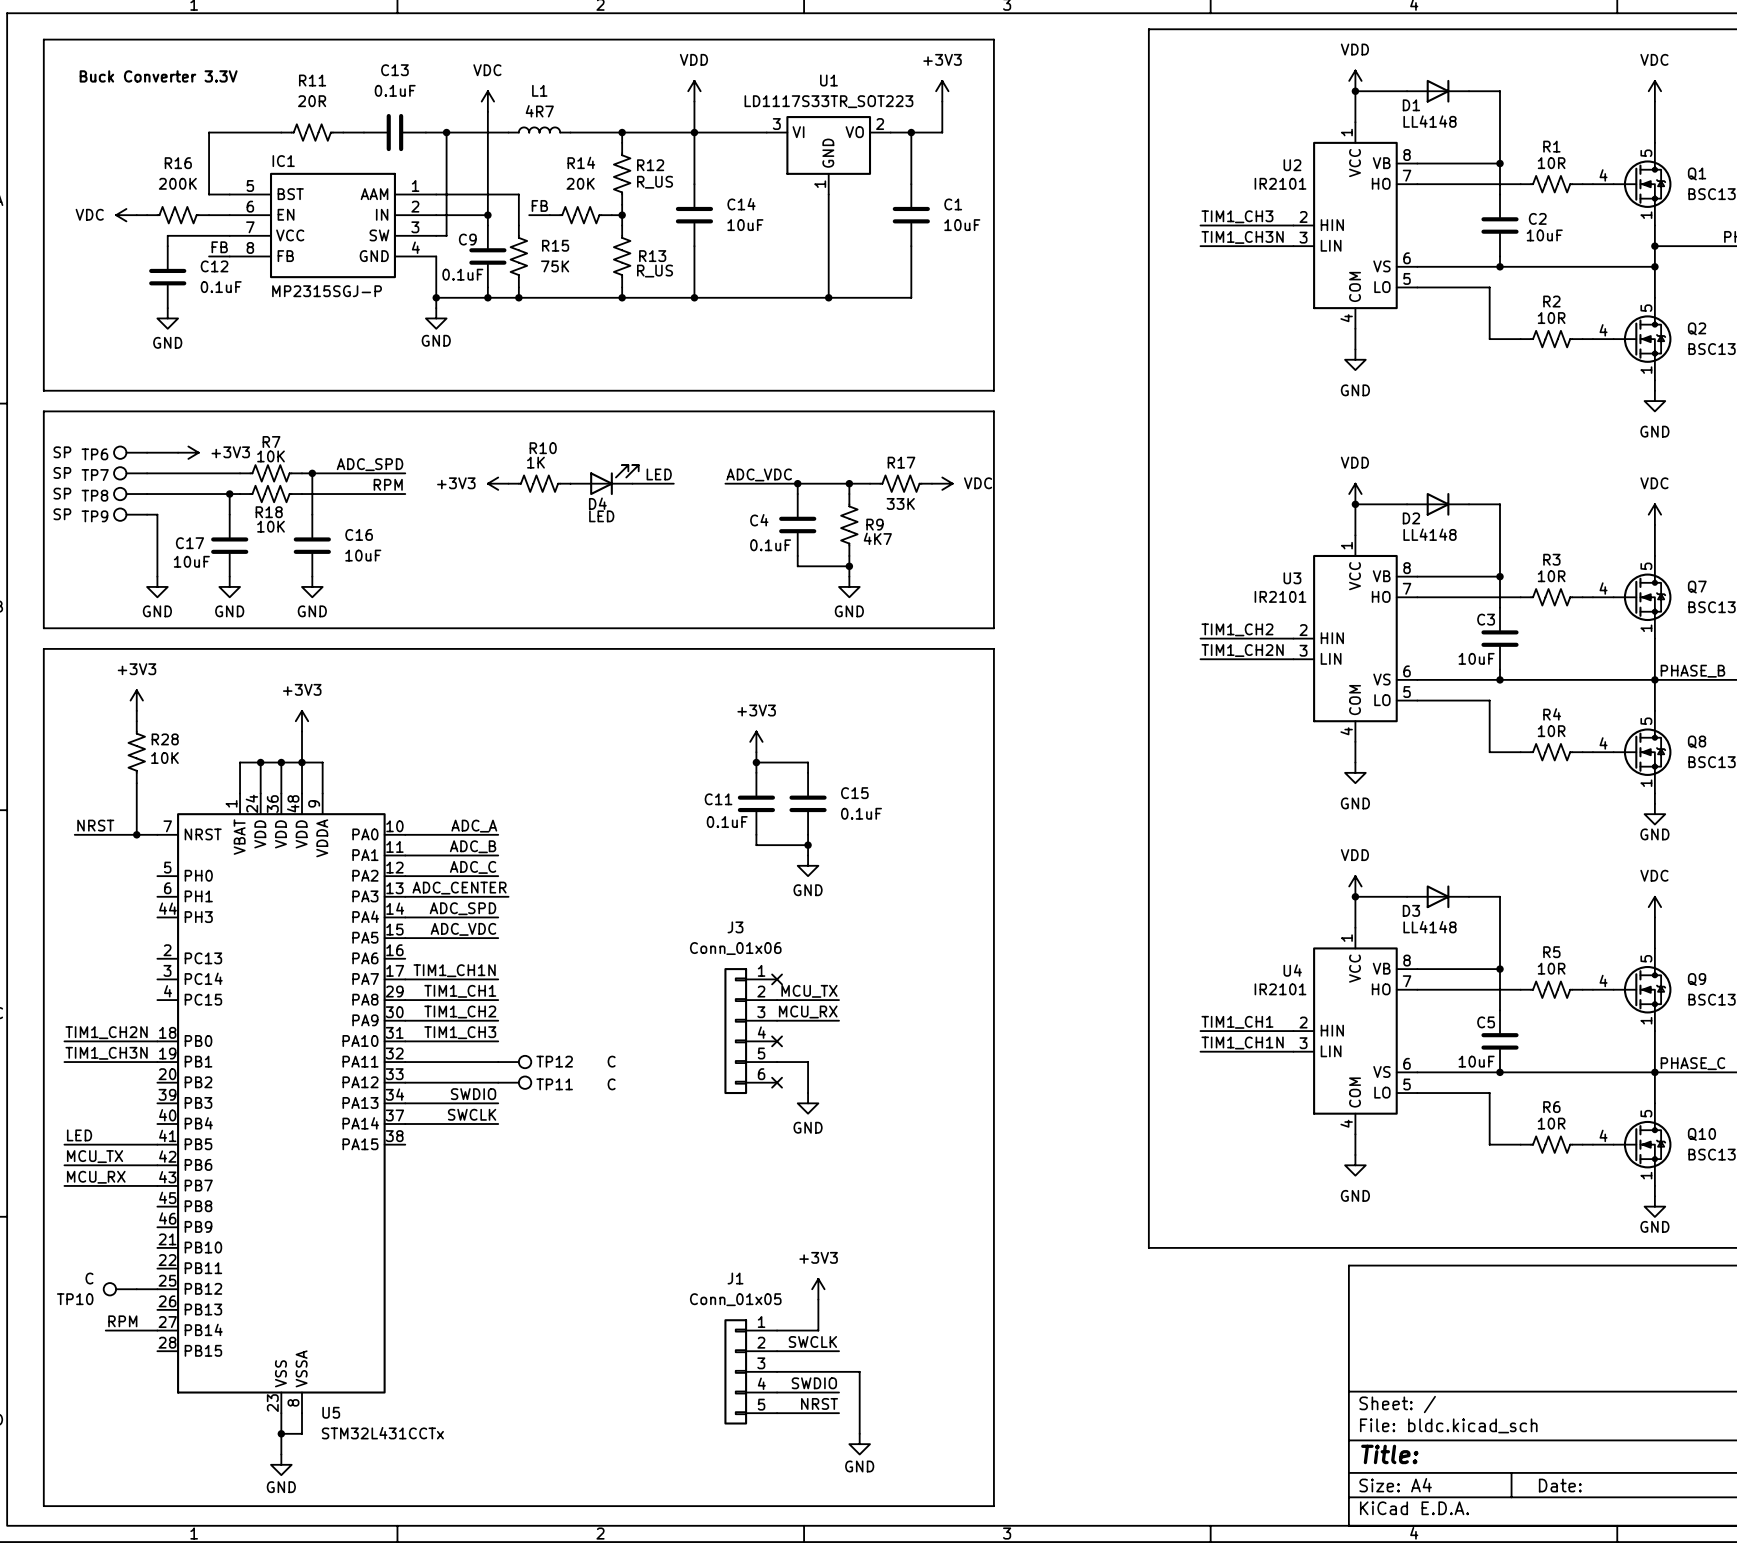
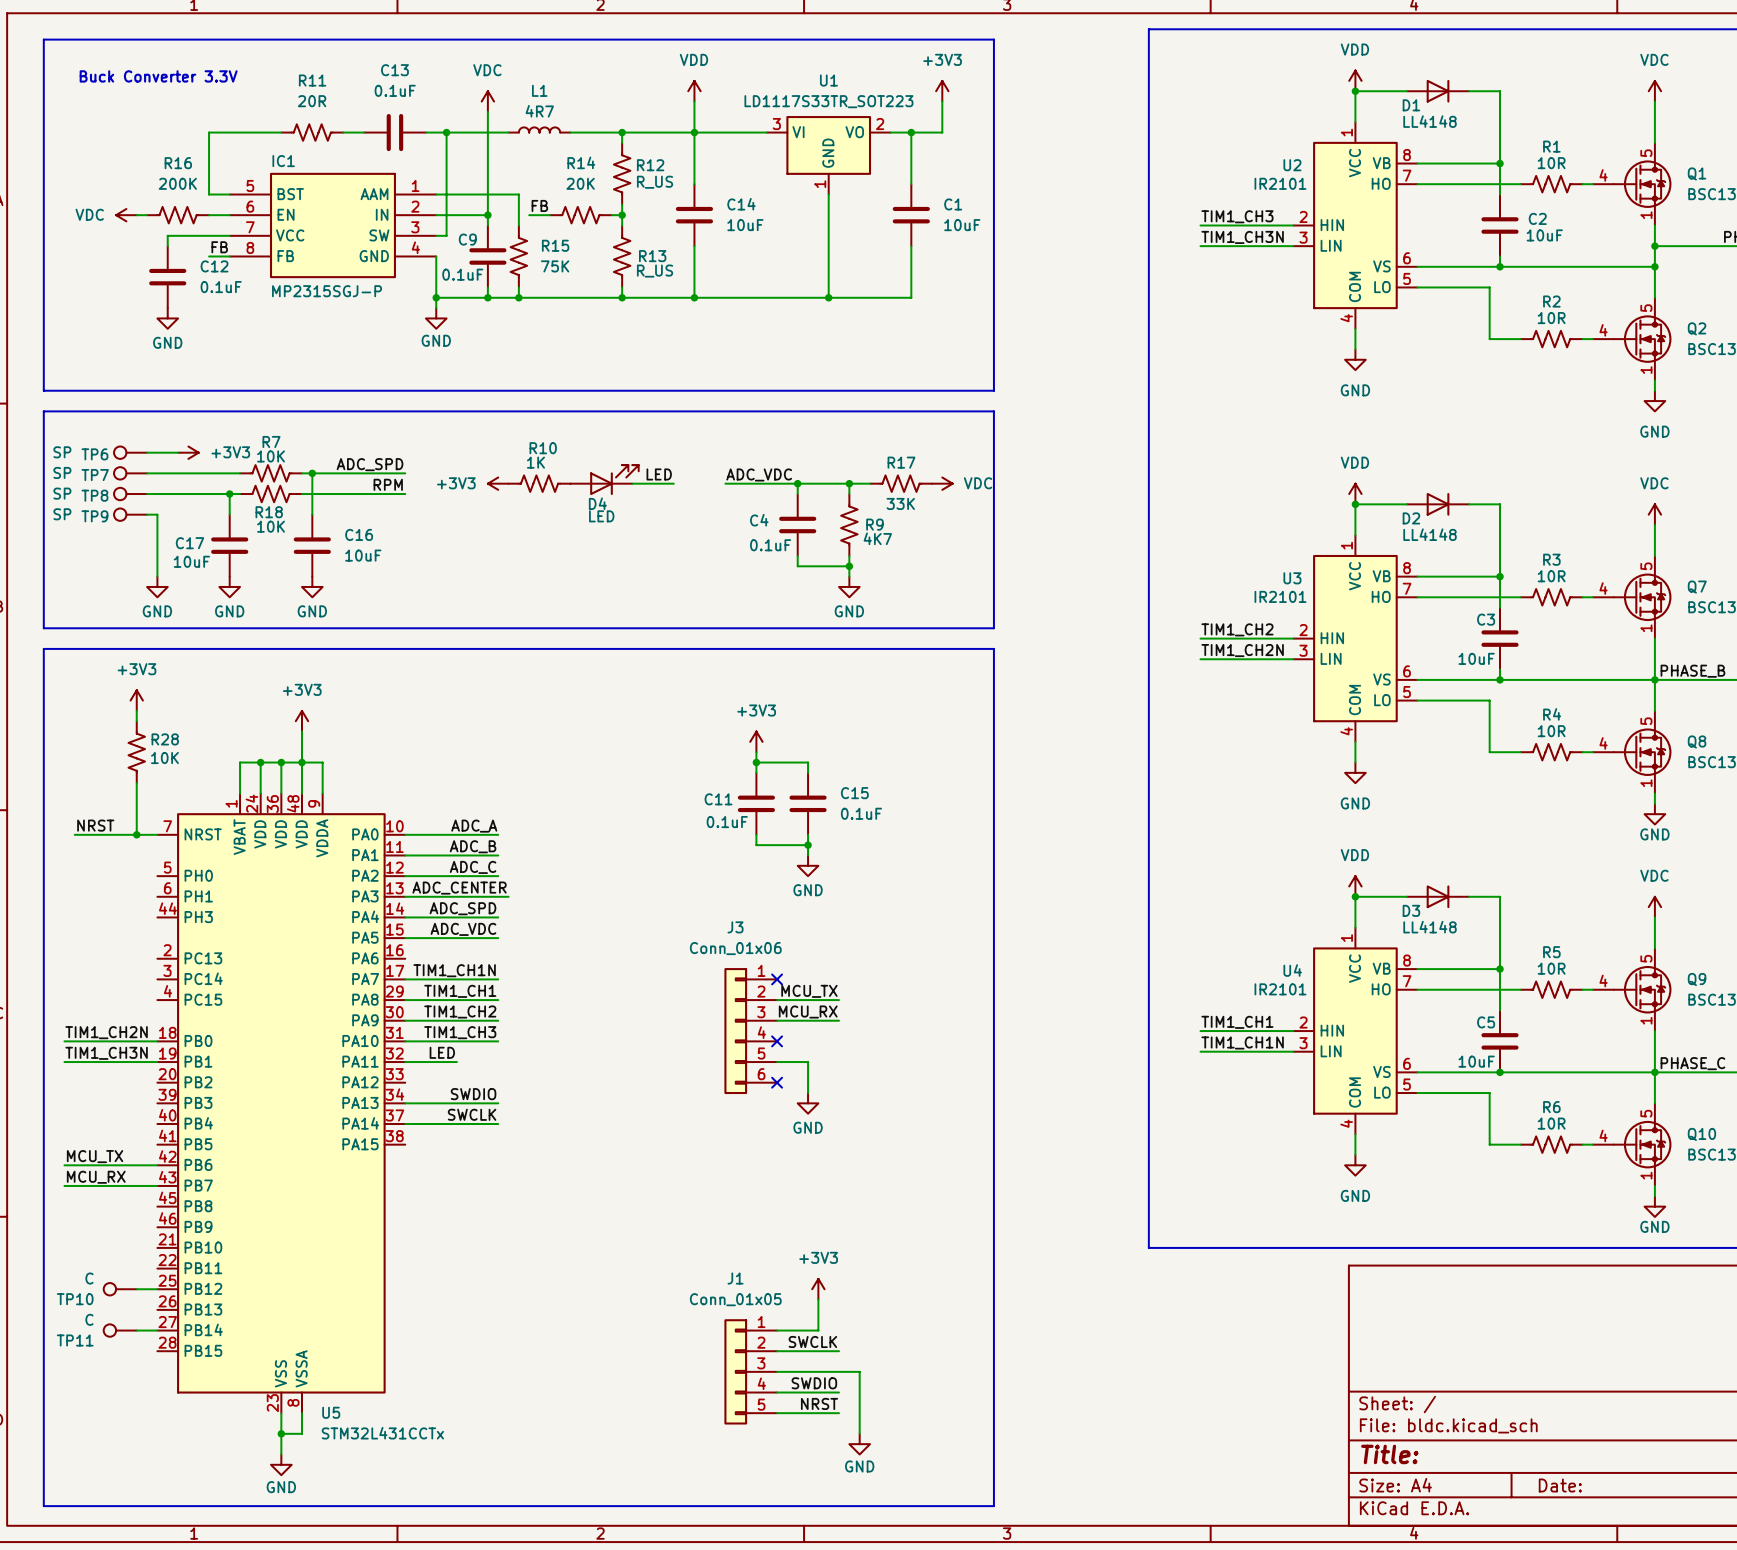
label: none -> LED (442, 1052)
wire: (456, 1062) (498, 1062) -> none
TP12: C (514, 1062) -> none
wire: (405, 1082) (498, 1082) -> none
TP11 position: (514, 1082) -> (120, 1330)
TP11 rotation: 0° (525, 1082) -> 180° (109, 1330)
TP11 value position: C (611, 1084) -> C (89, 1319)
label: LED (79, 1135) -> none
wire: (64, 1144) (157, 1144) -> none
label: RPM (122, 1321) -> none

